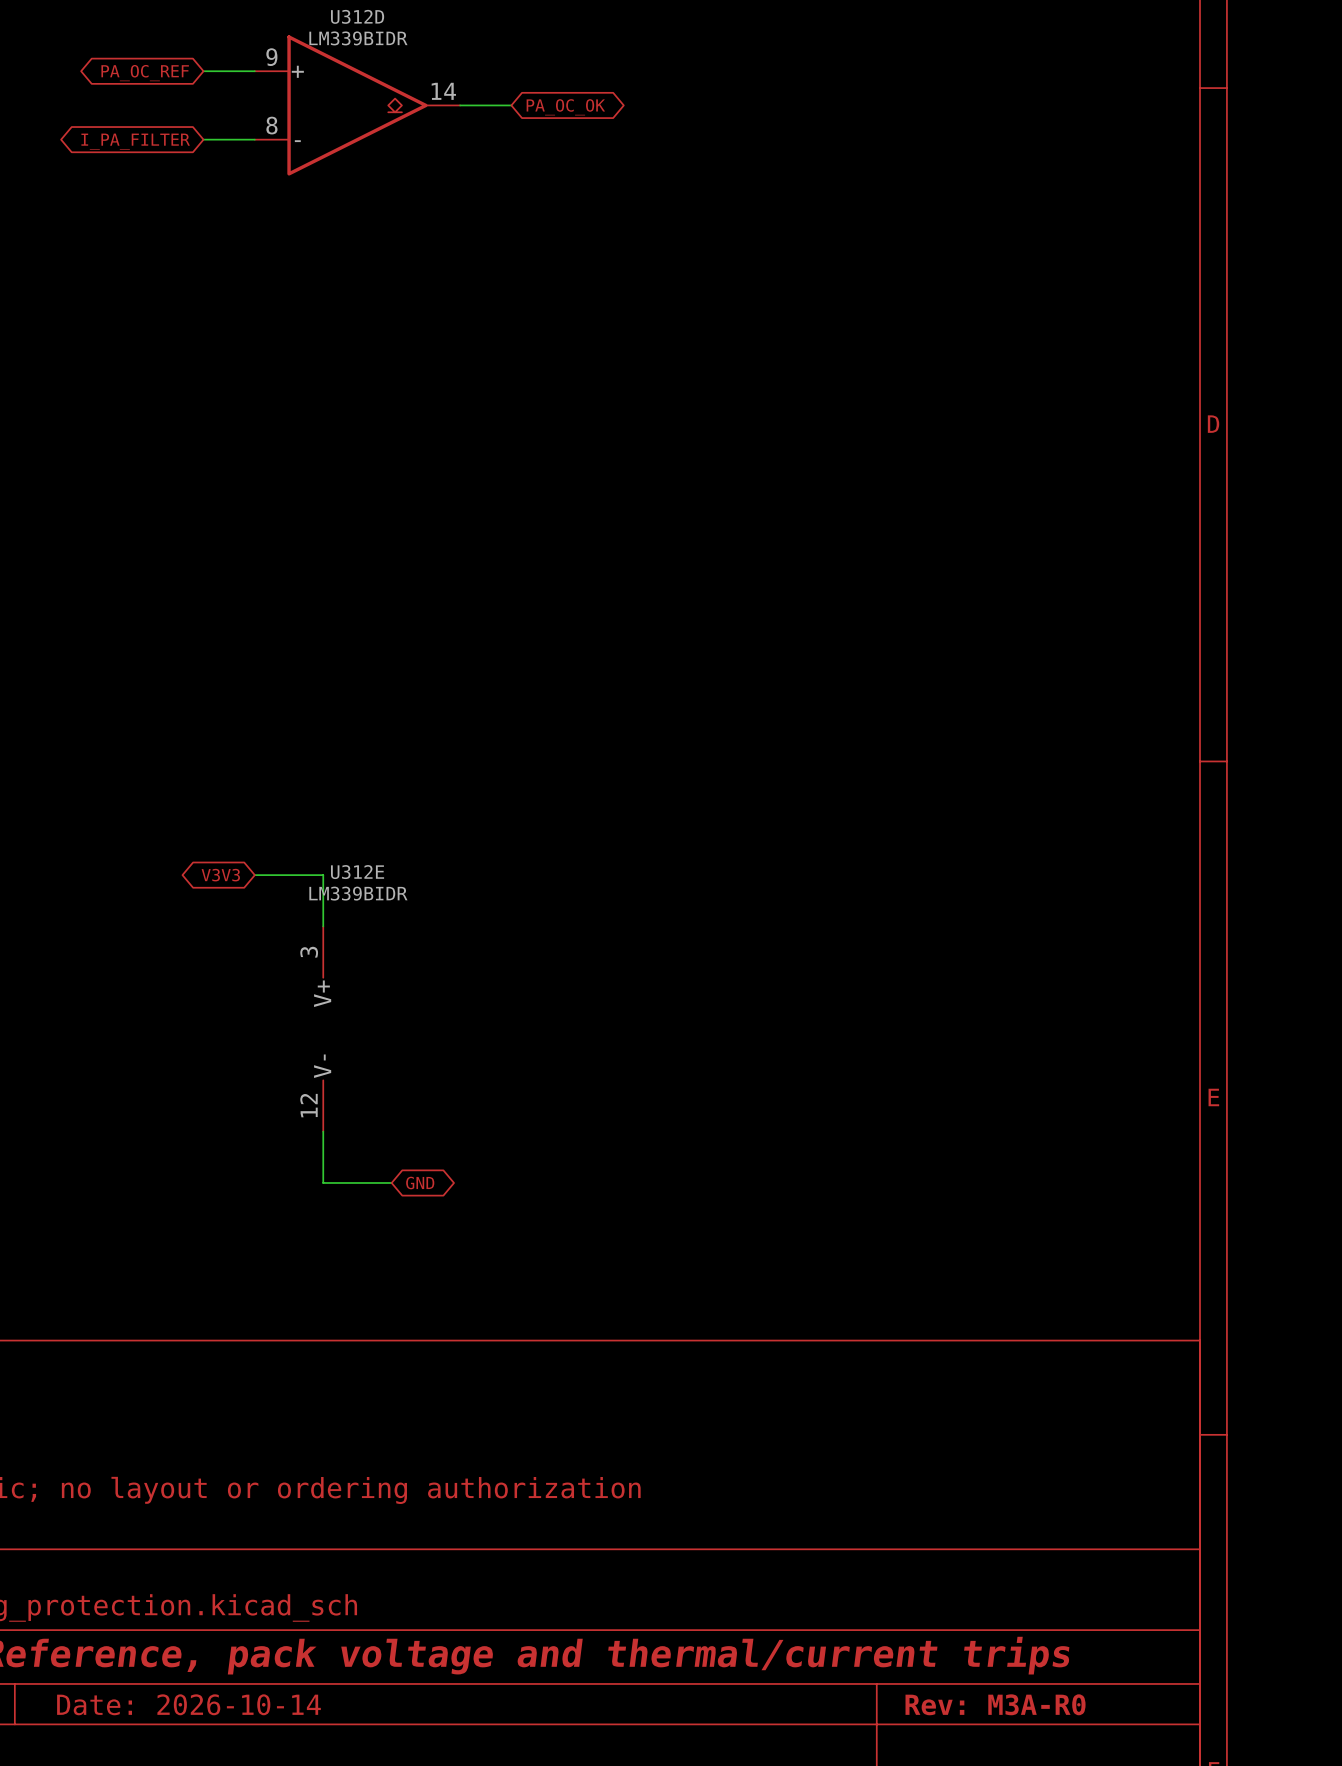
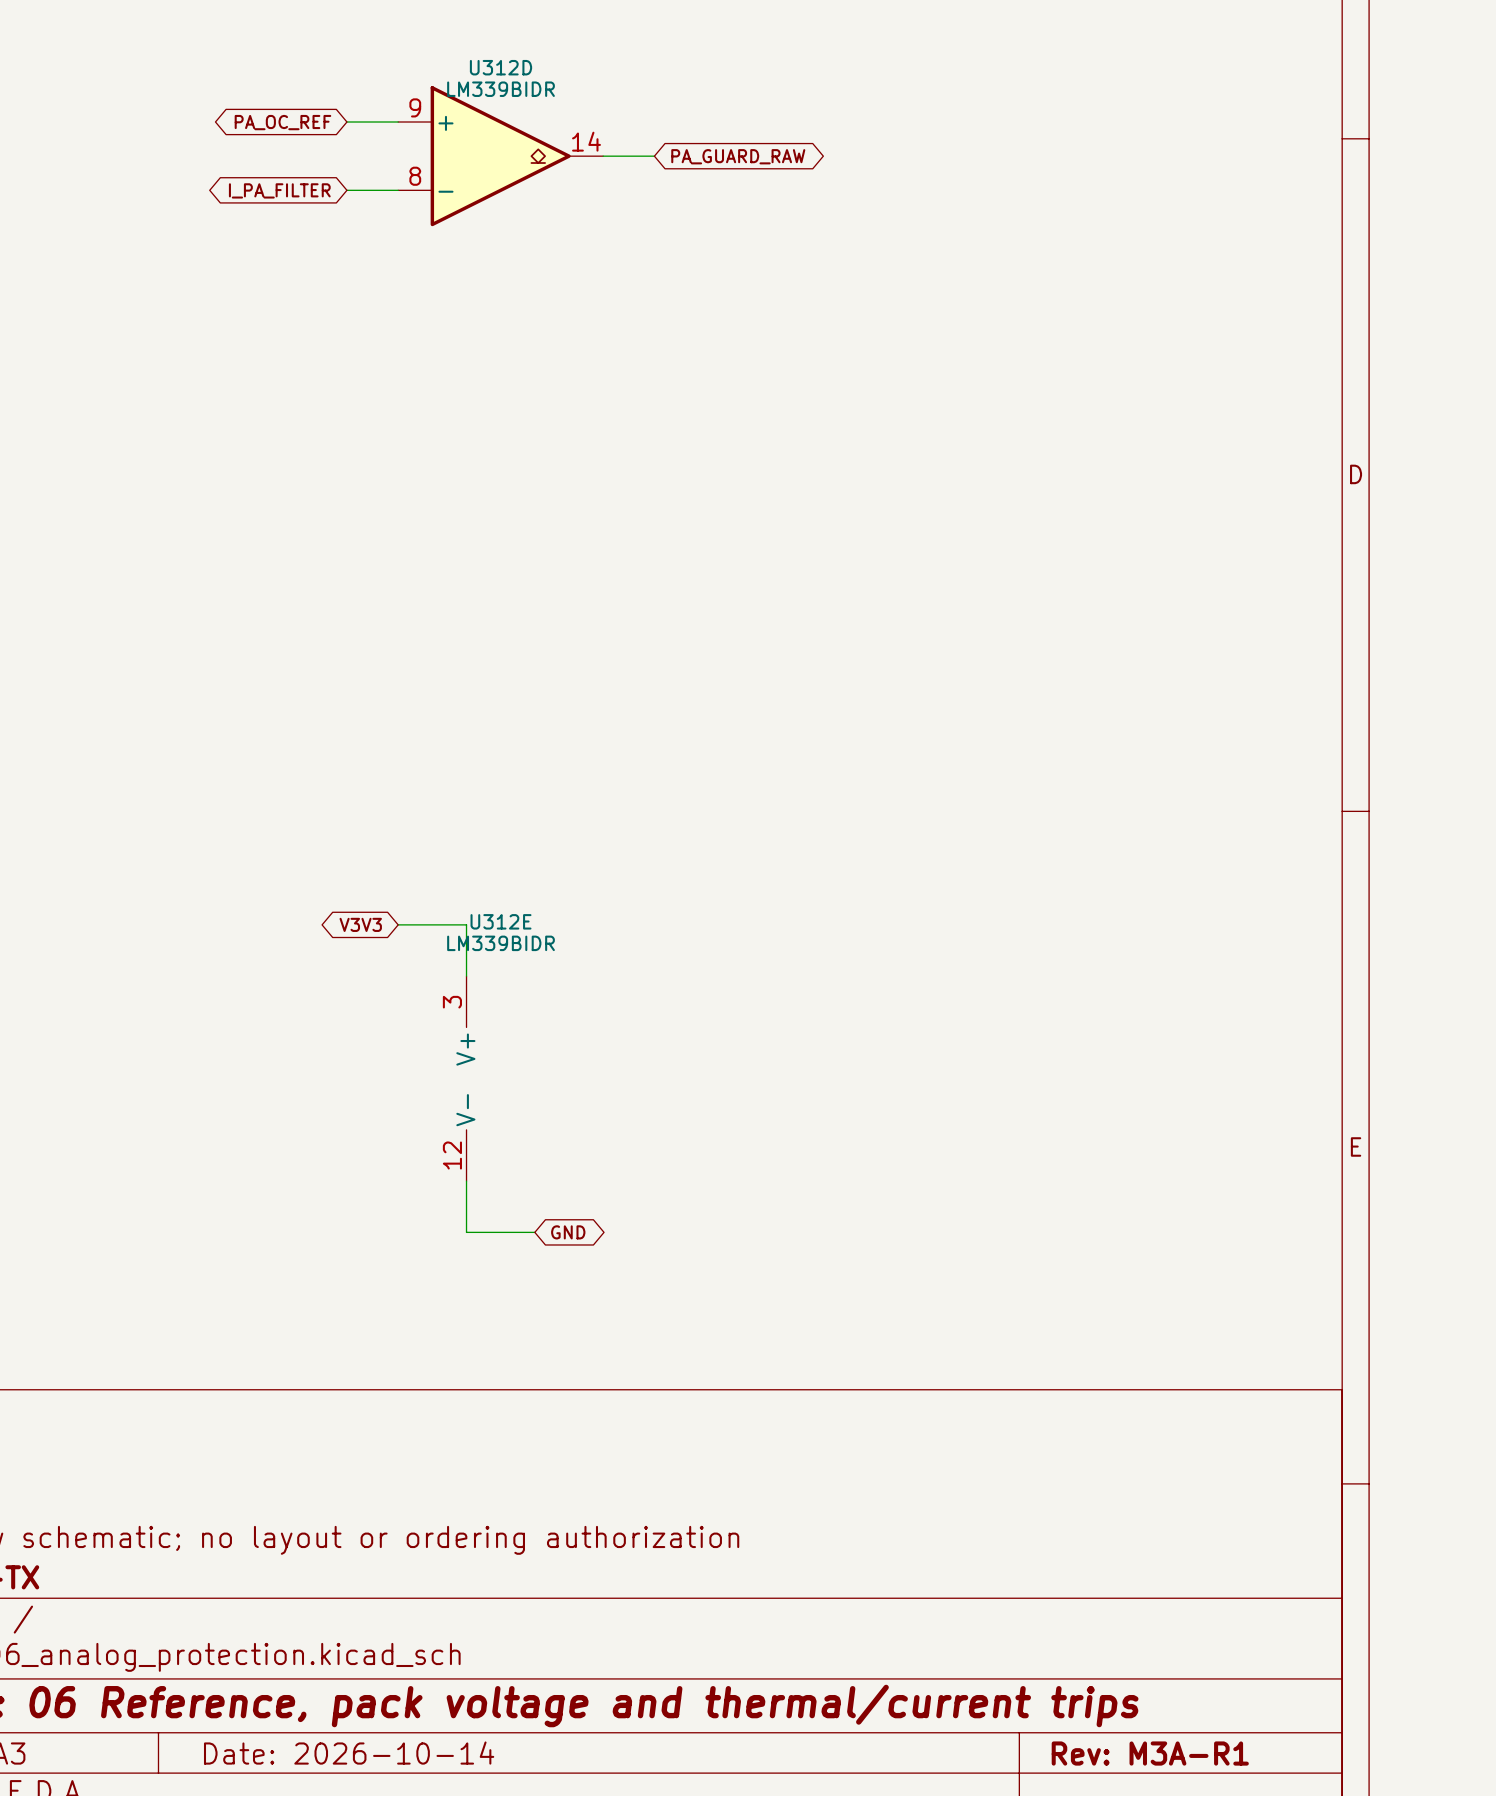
global label: PA_OC_OK (565, 107) -> PA_GUARD_RAW (738, 156)
title block: Rev: M3A-R0 (995, 1704) -> Rev: M3A-R1 (1150, 1753)

